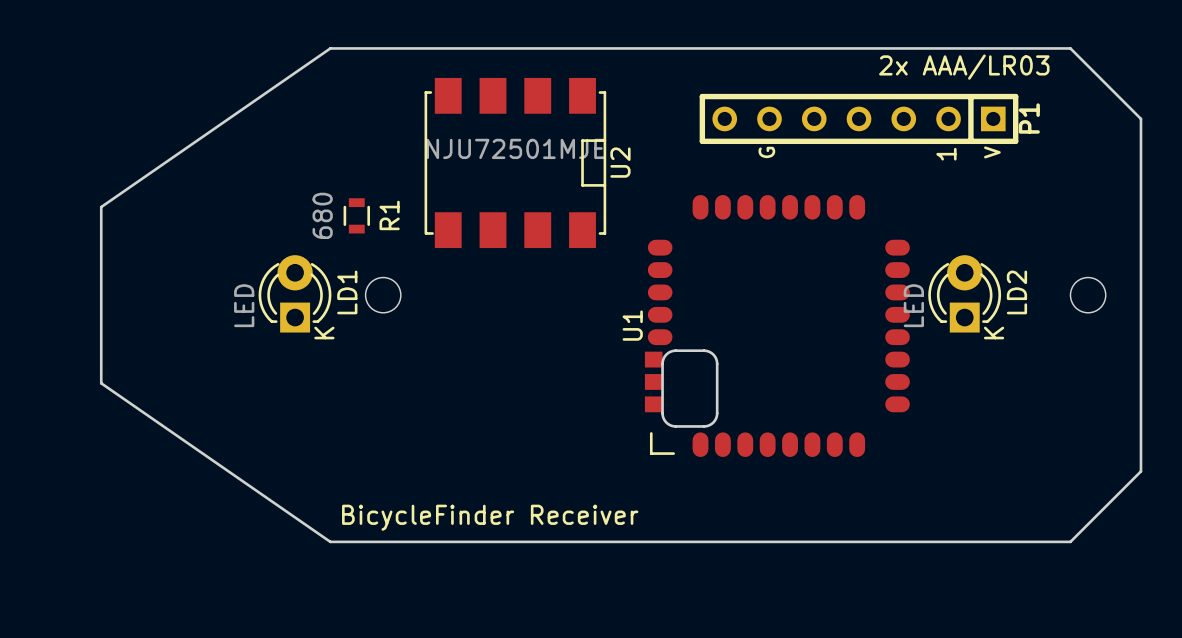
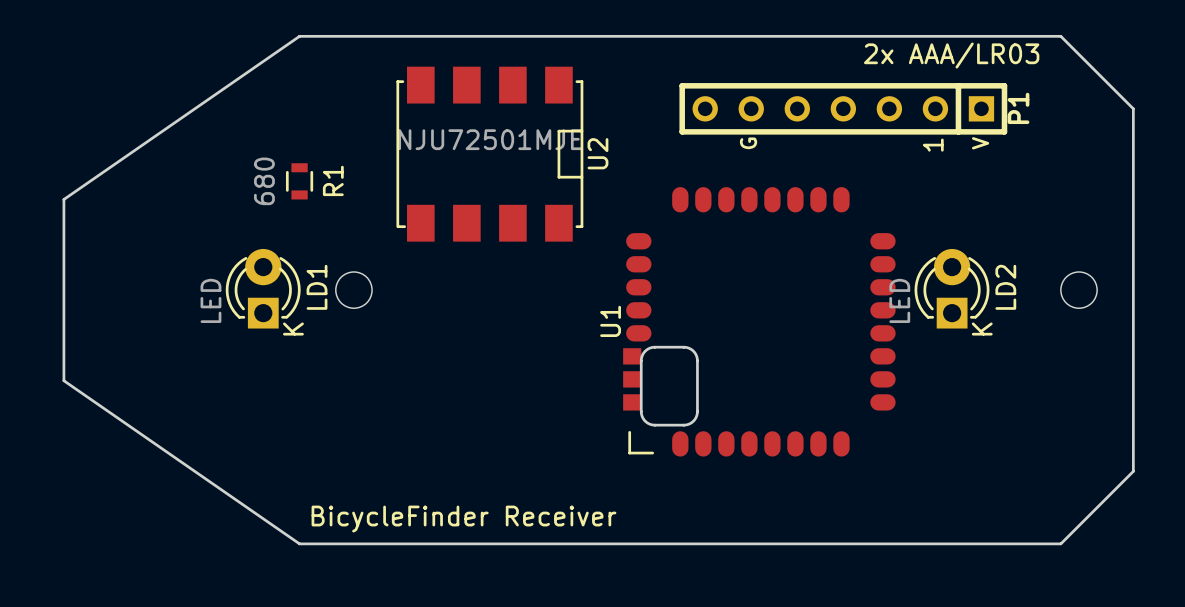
R1 position: (356, 215) -> (299, 181)

